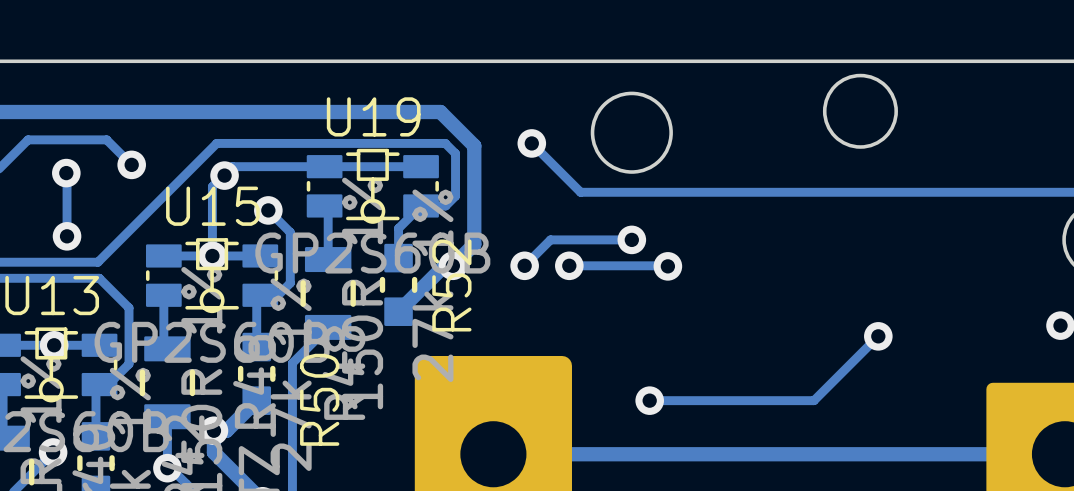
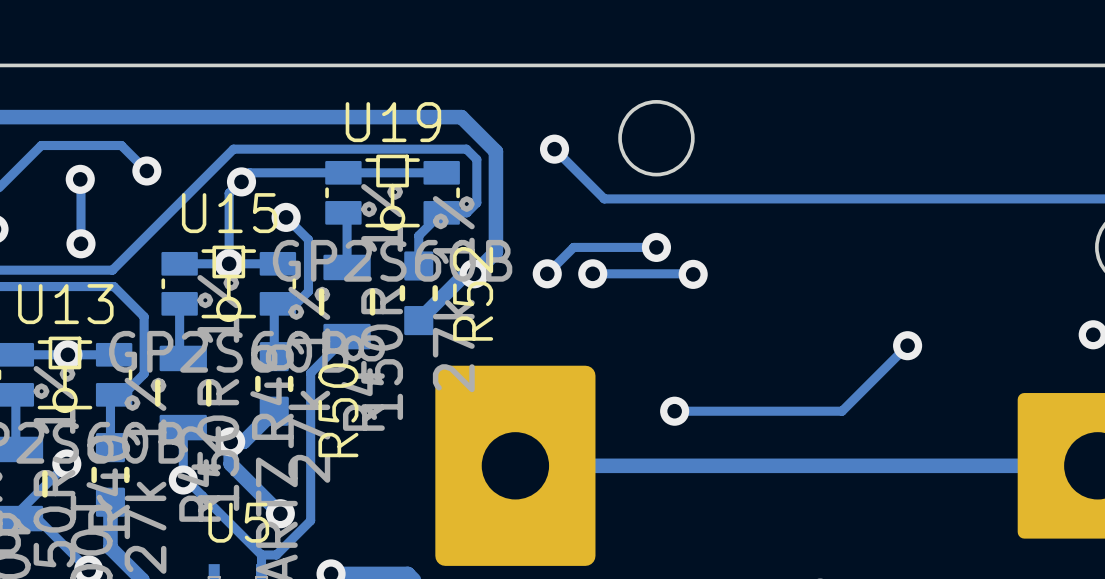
round board edge: [590, 91, 673, 174] -> none
round board edge position: (860, 111) -> (656, 138)

